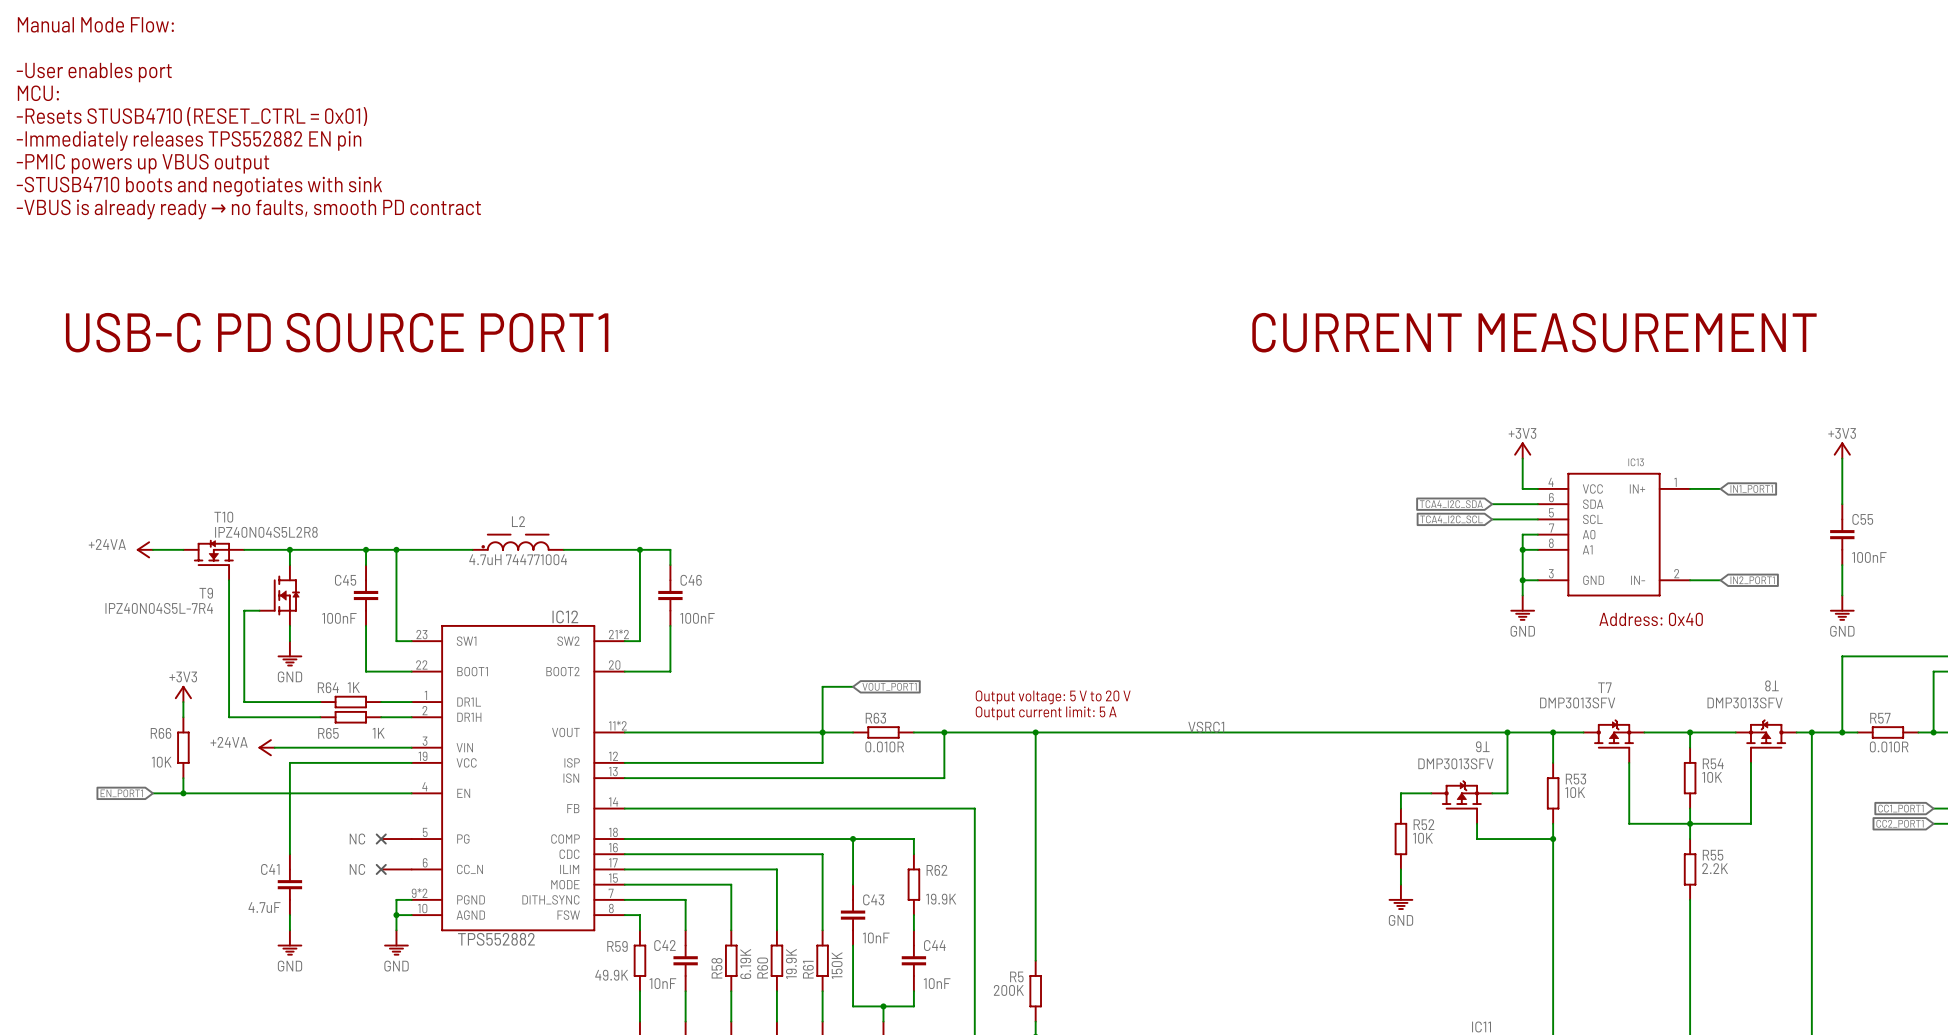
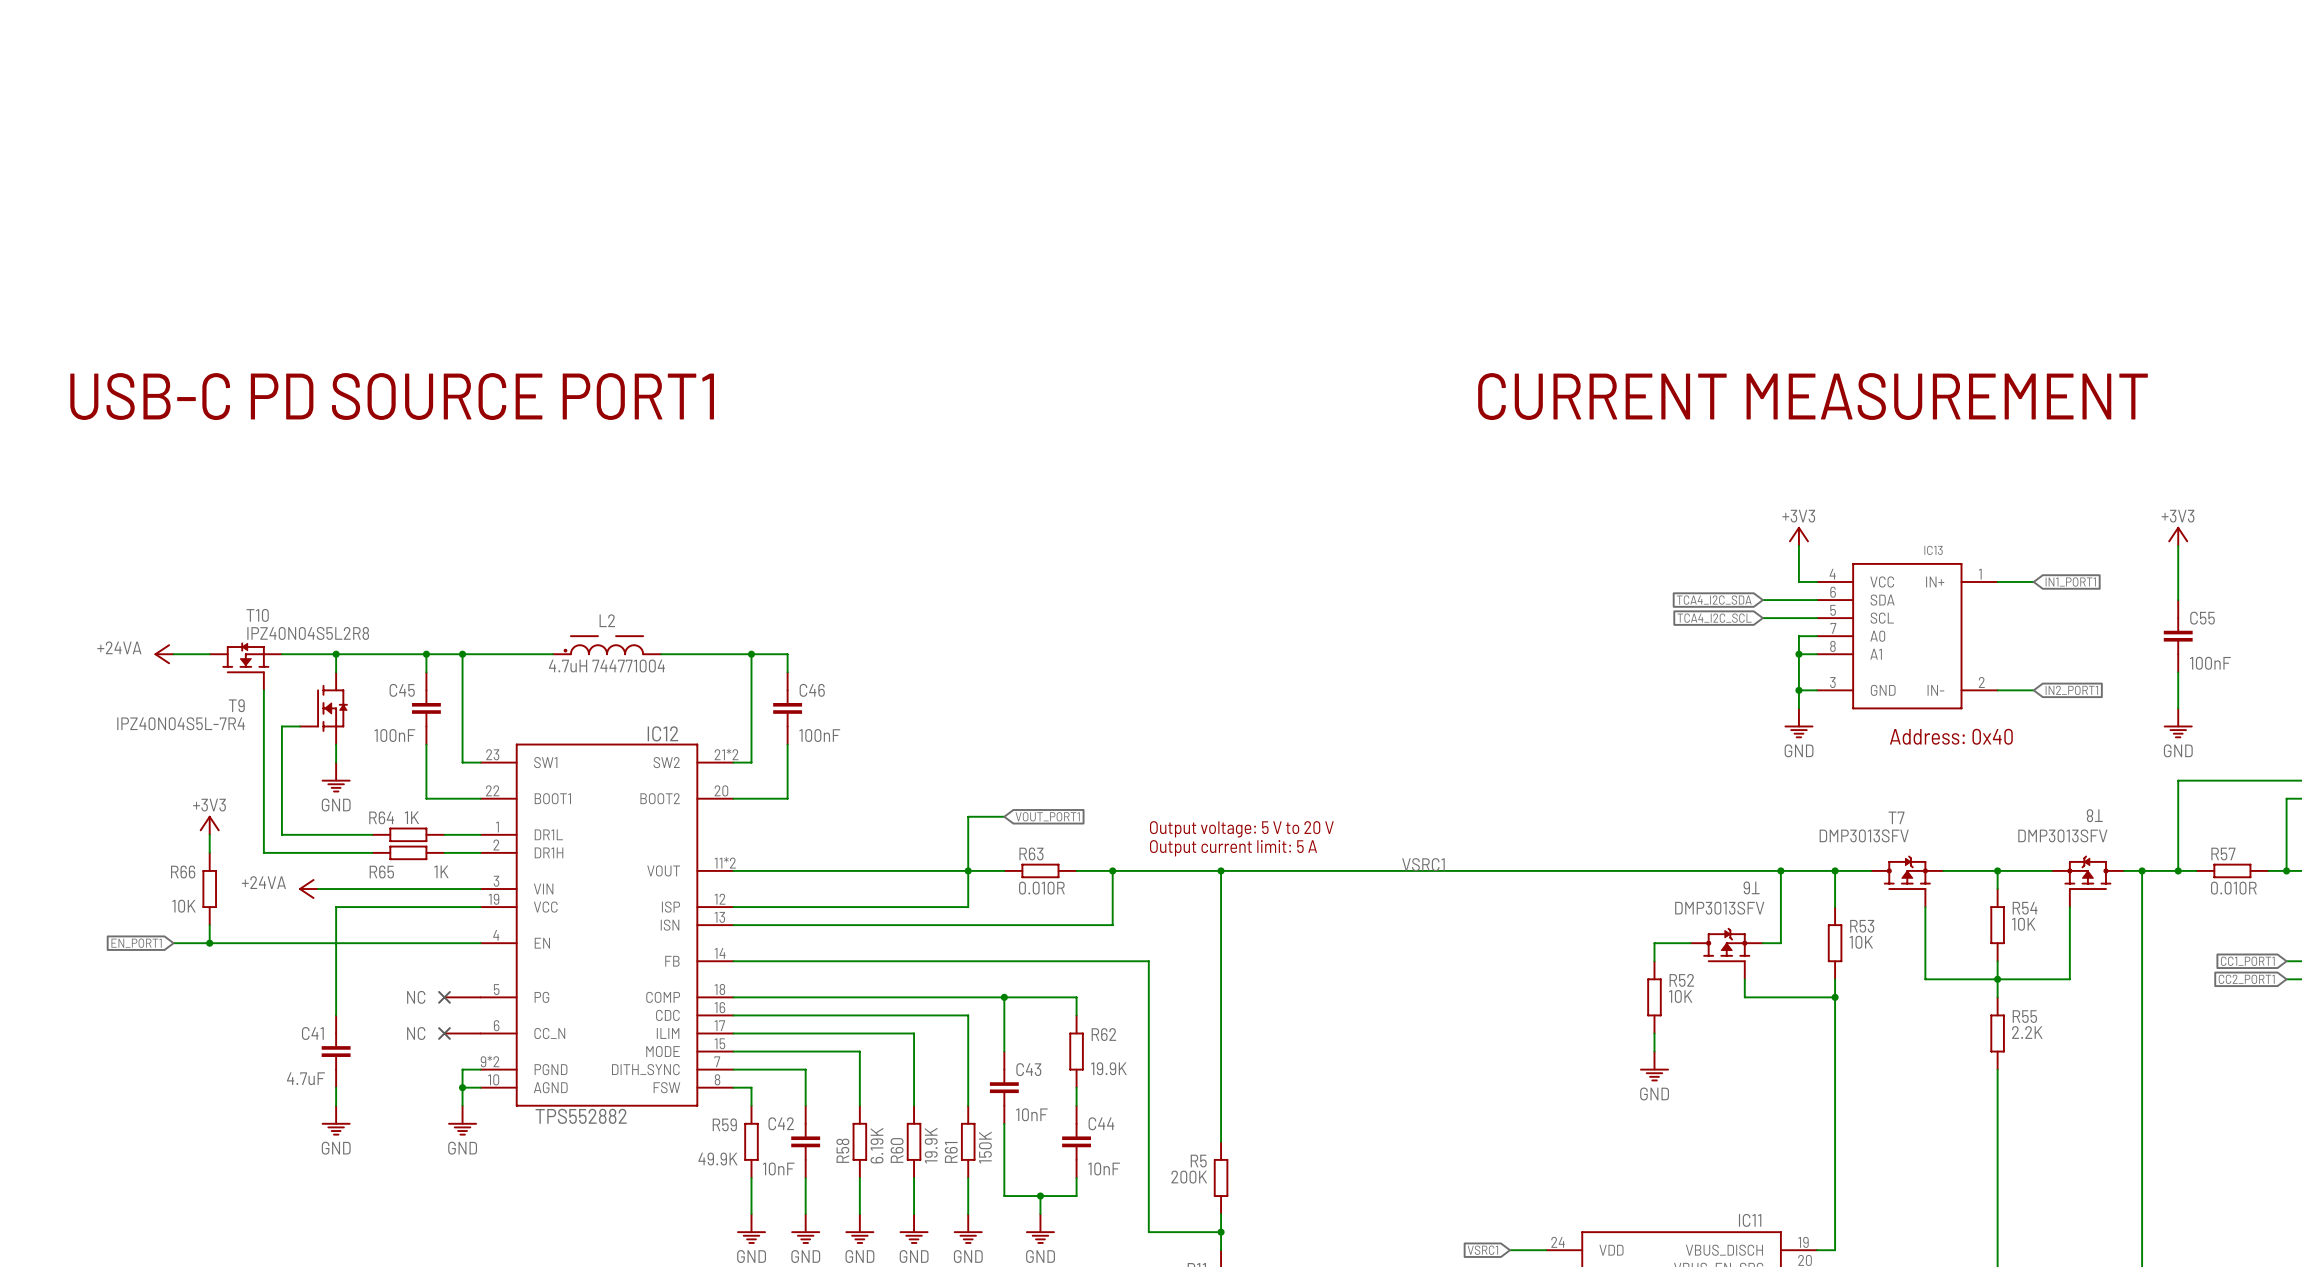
text: Manual Mode Flow: (95, 24) -> none
text: -User enables port (94, 72) -> none
text: MCU: (38, 93) -> none
text: -Resets STUSB4710 (RESET_CTRL = 0x01) (191, 116) -> none
text: -Immediately releases TPS552882 EN pin (189, 140) -> none
text: -PMIC powers up VBUS output (142, 163) -> none
text: -STUSB4710 boots and negotiates with sink (199, 186) -> none
text: -VBUS is already ready → no faults, smooth PD contract (248, 209) -> none

